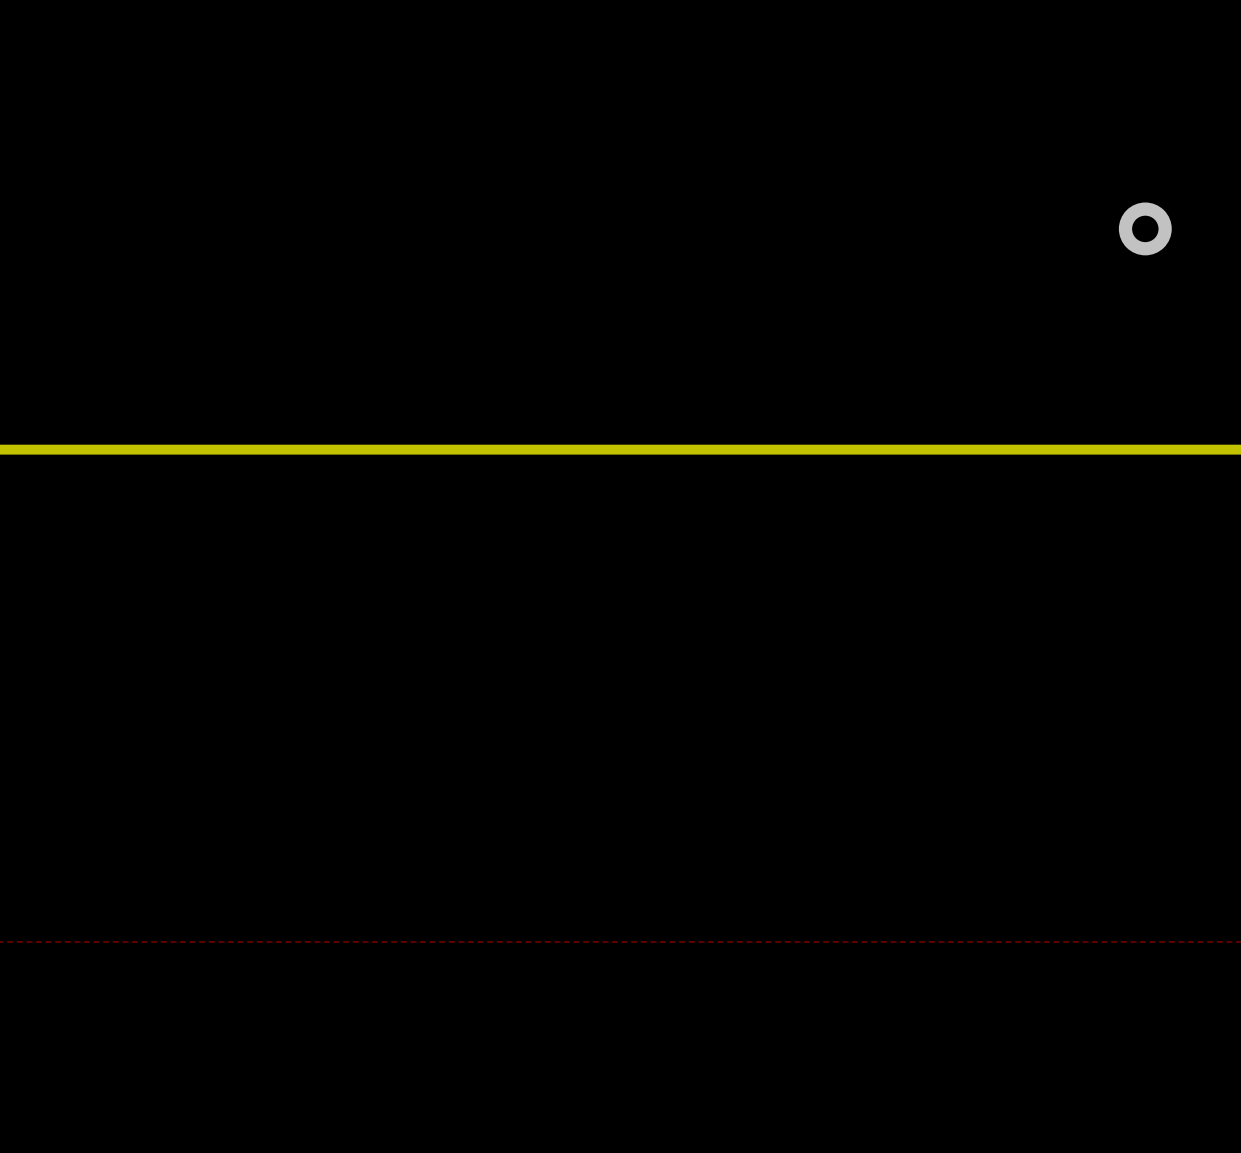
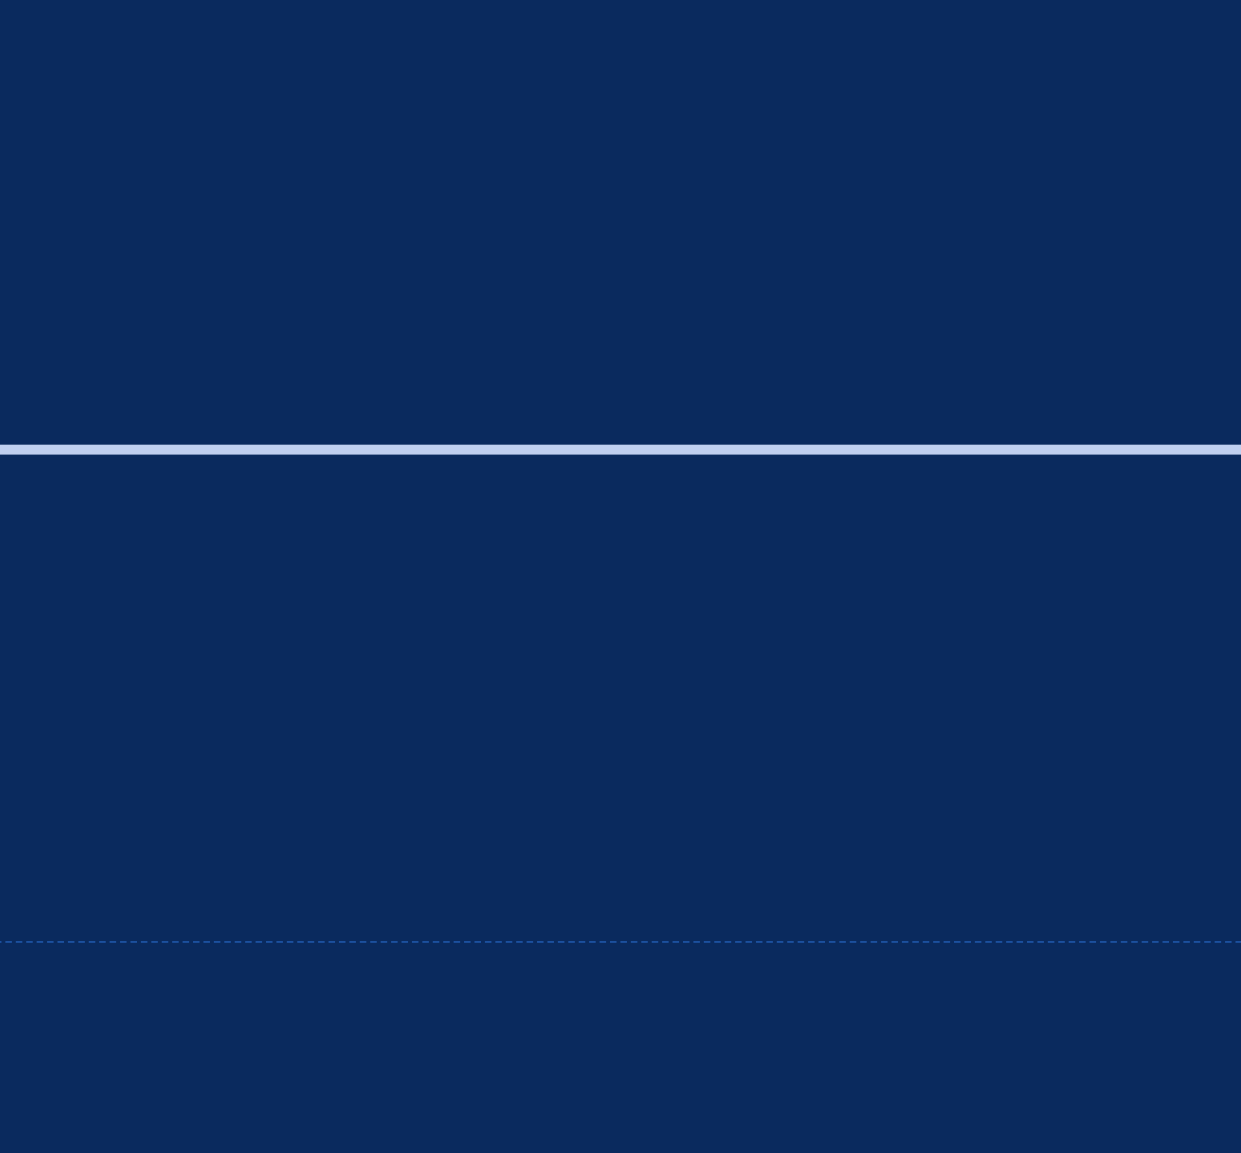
via: (1145, 228) -> none

